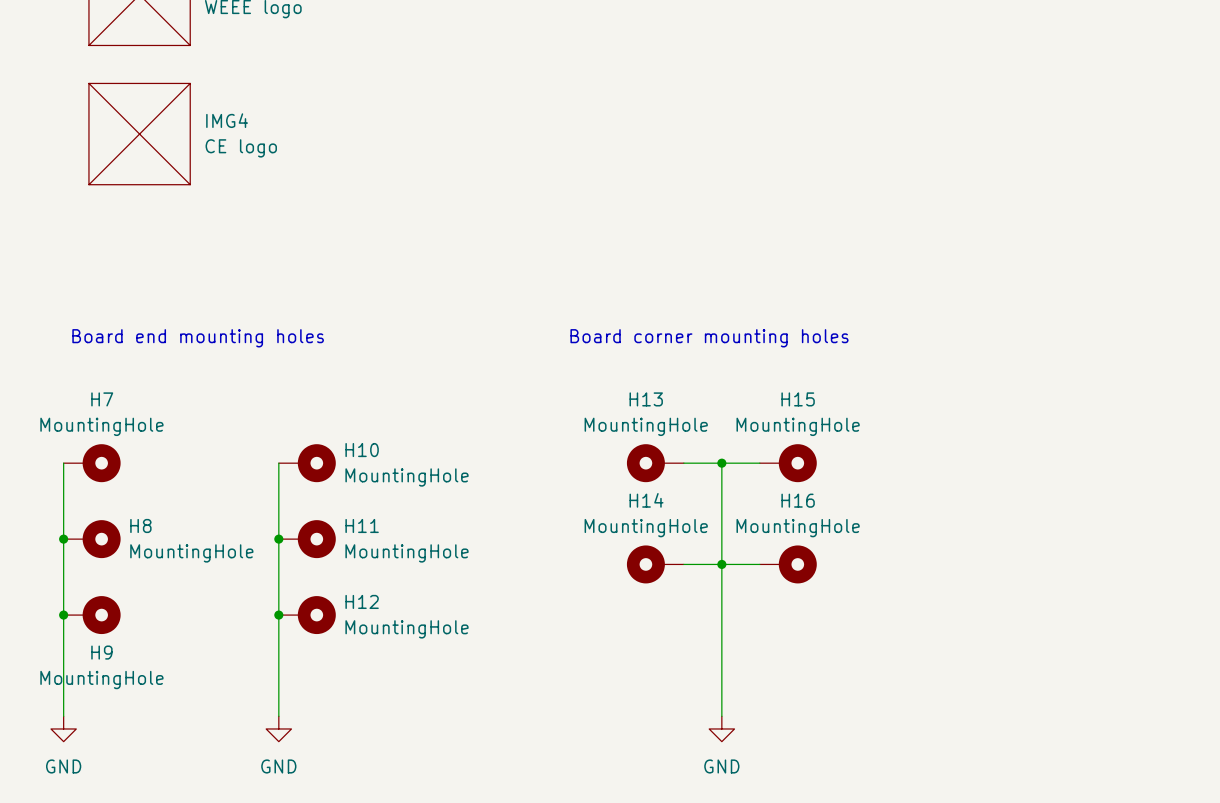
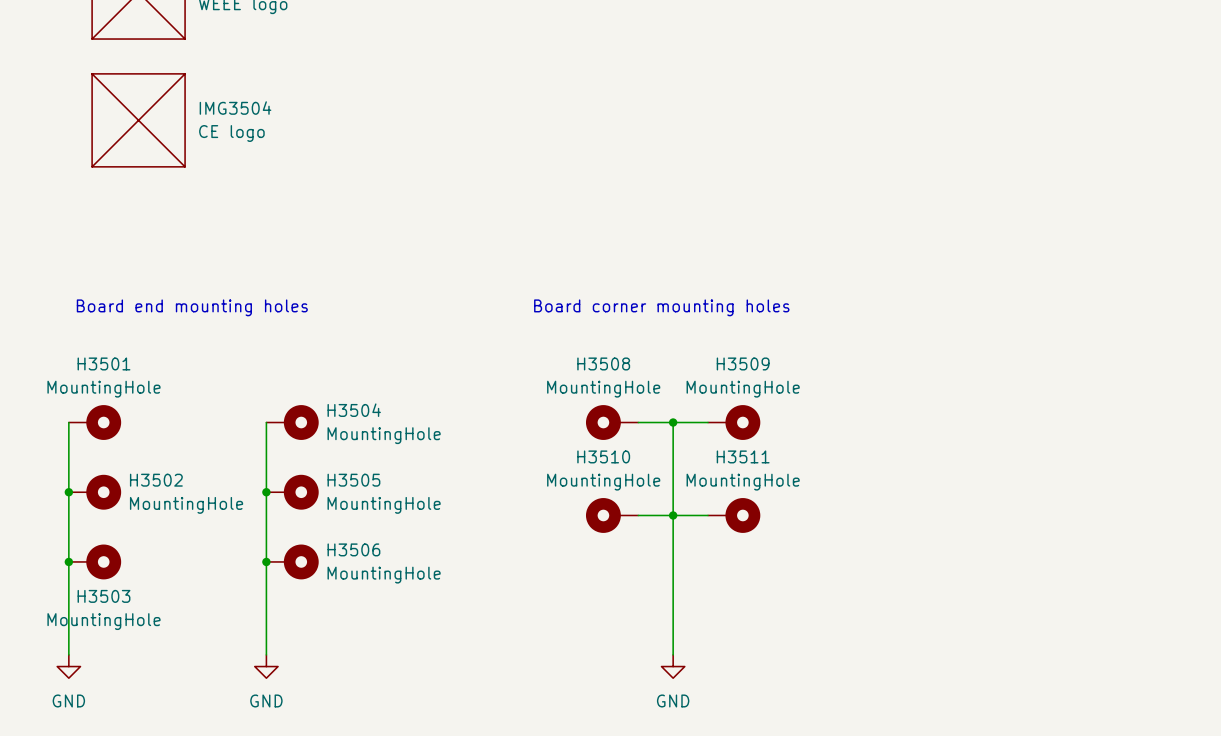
IMG4 name: IMG4 (227, 120) -> IMG3504 (235, 108)
H7 name: H7 (102, 399) -> H3501 (103, 363)
H13 name: H13 (646, 399) -> H3508 (603, 363)
H15 name: H15 (798, 399) -> H3509 (743, 363)
H10 name: H10 (362, 450) -> H3504 (354, 410)
H14 name: H14 (646, 500) -> H3510 (603, 456)
H16 name: H16 (798, 500) -> H3511 (743, 456)
H8 name: H8 (140, 525) -> H3502 (156, 480)
H11 name: H11 (362, 525) -> H3505 (353, 480)
H12 name: H12 (362, 601) -> H3506 (353, 549)
H9 name: H9 (101, 652) -> H3503 (103, 596)

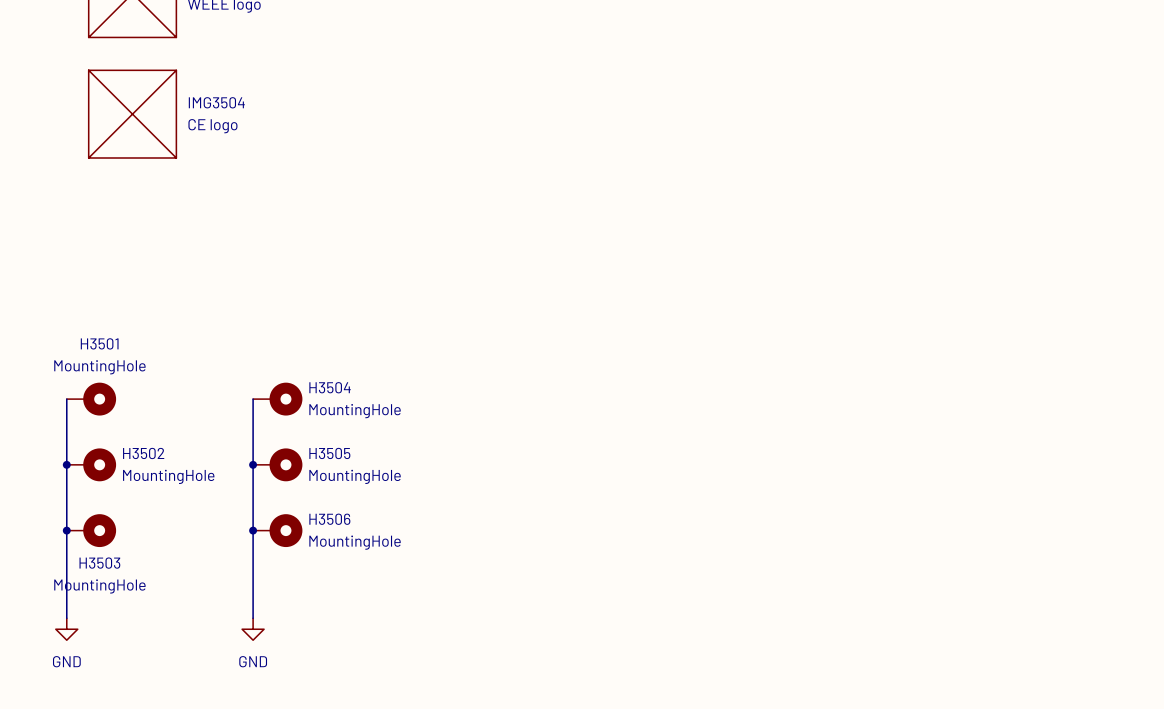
text: Board end mounting holes (192, 307) -> none
text: Board corner mounting holes (661, 307) -> none
H3508: MountingHole (612, 422) -> none
wire: (638, 422) (708, 422) -> none
wire: (673, 422) (673, 654) -> none
junction: (673, 422) -> none
H3509: MountingHole (734, 422) -> none
H3510: MountingHole (612, 515) -> none
wire: (638, 515) (708, 515) -> none
junction: (673, 515) -> none
H3511: MountingHole (734, 515) -> none
power symbol: GND (673, 666) -> none

